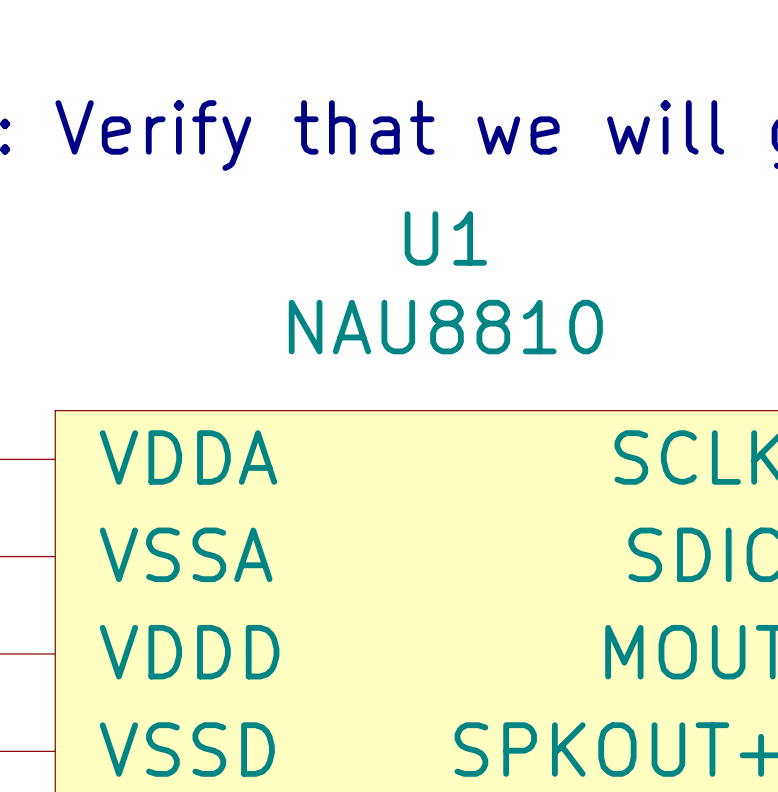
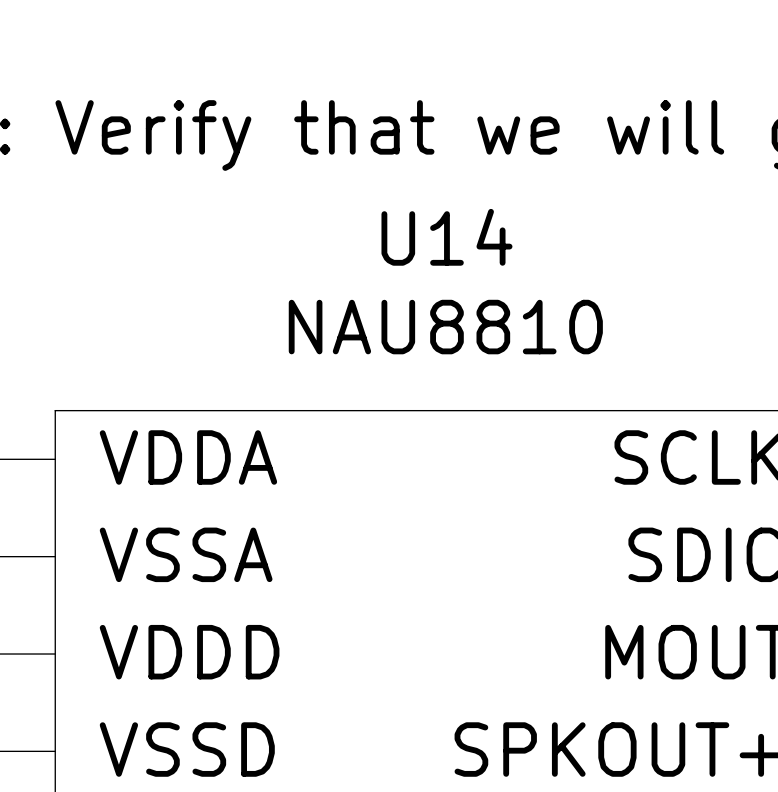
U1 name: U1 (445, 238) -> U14 (446, 237)

